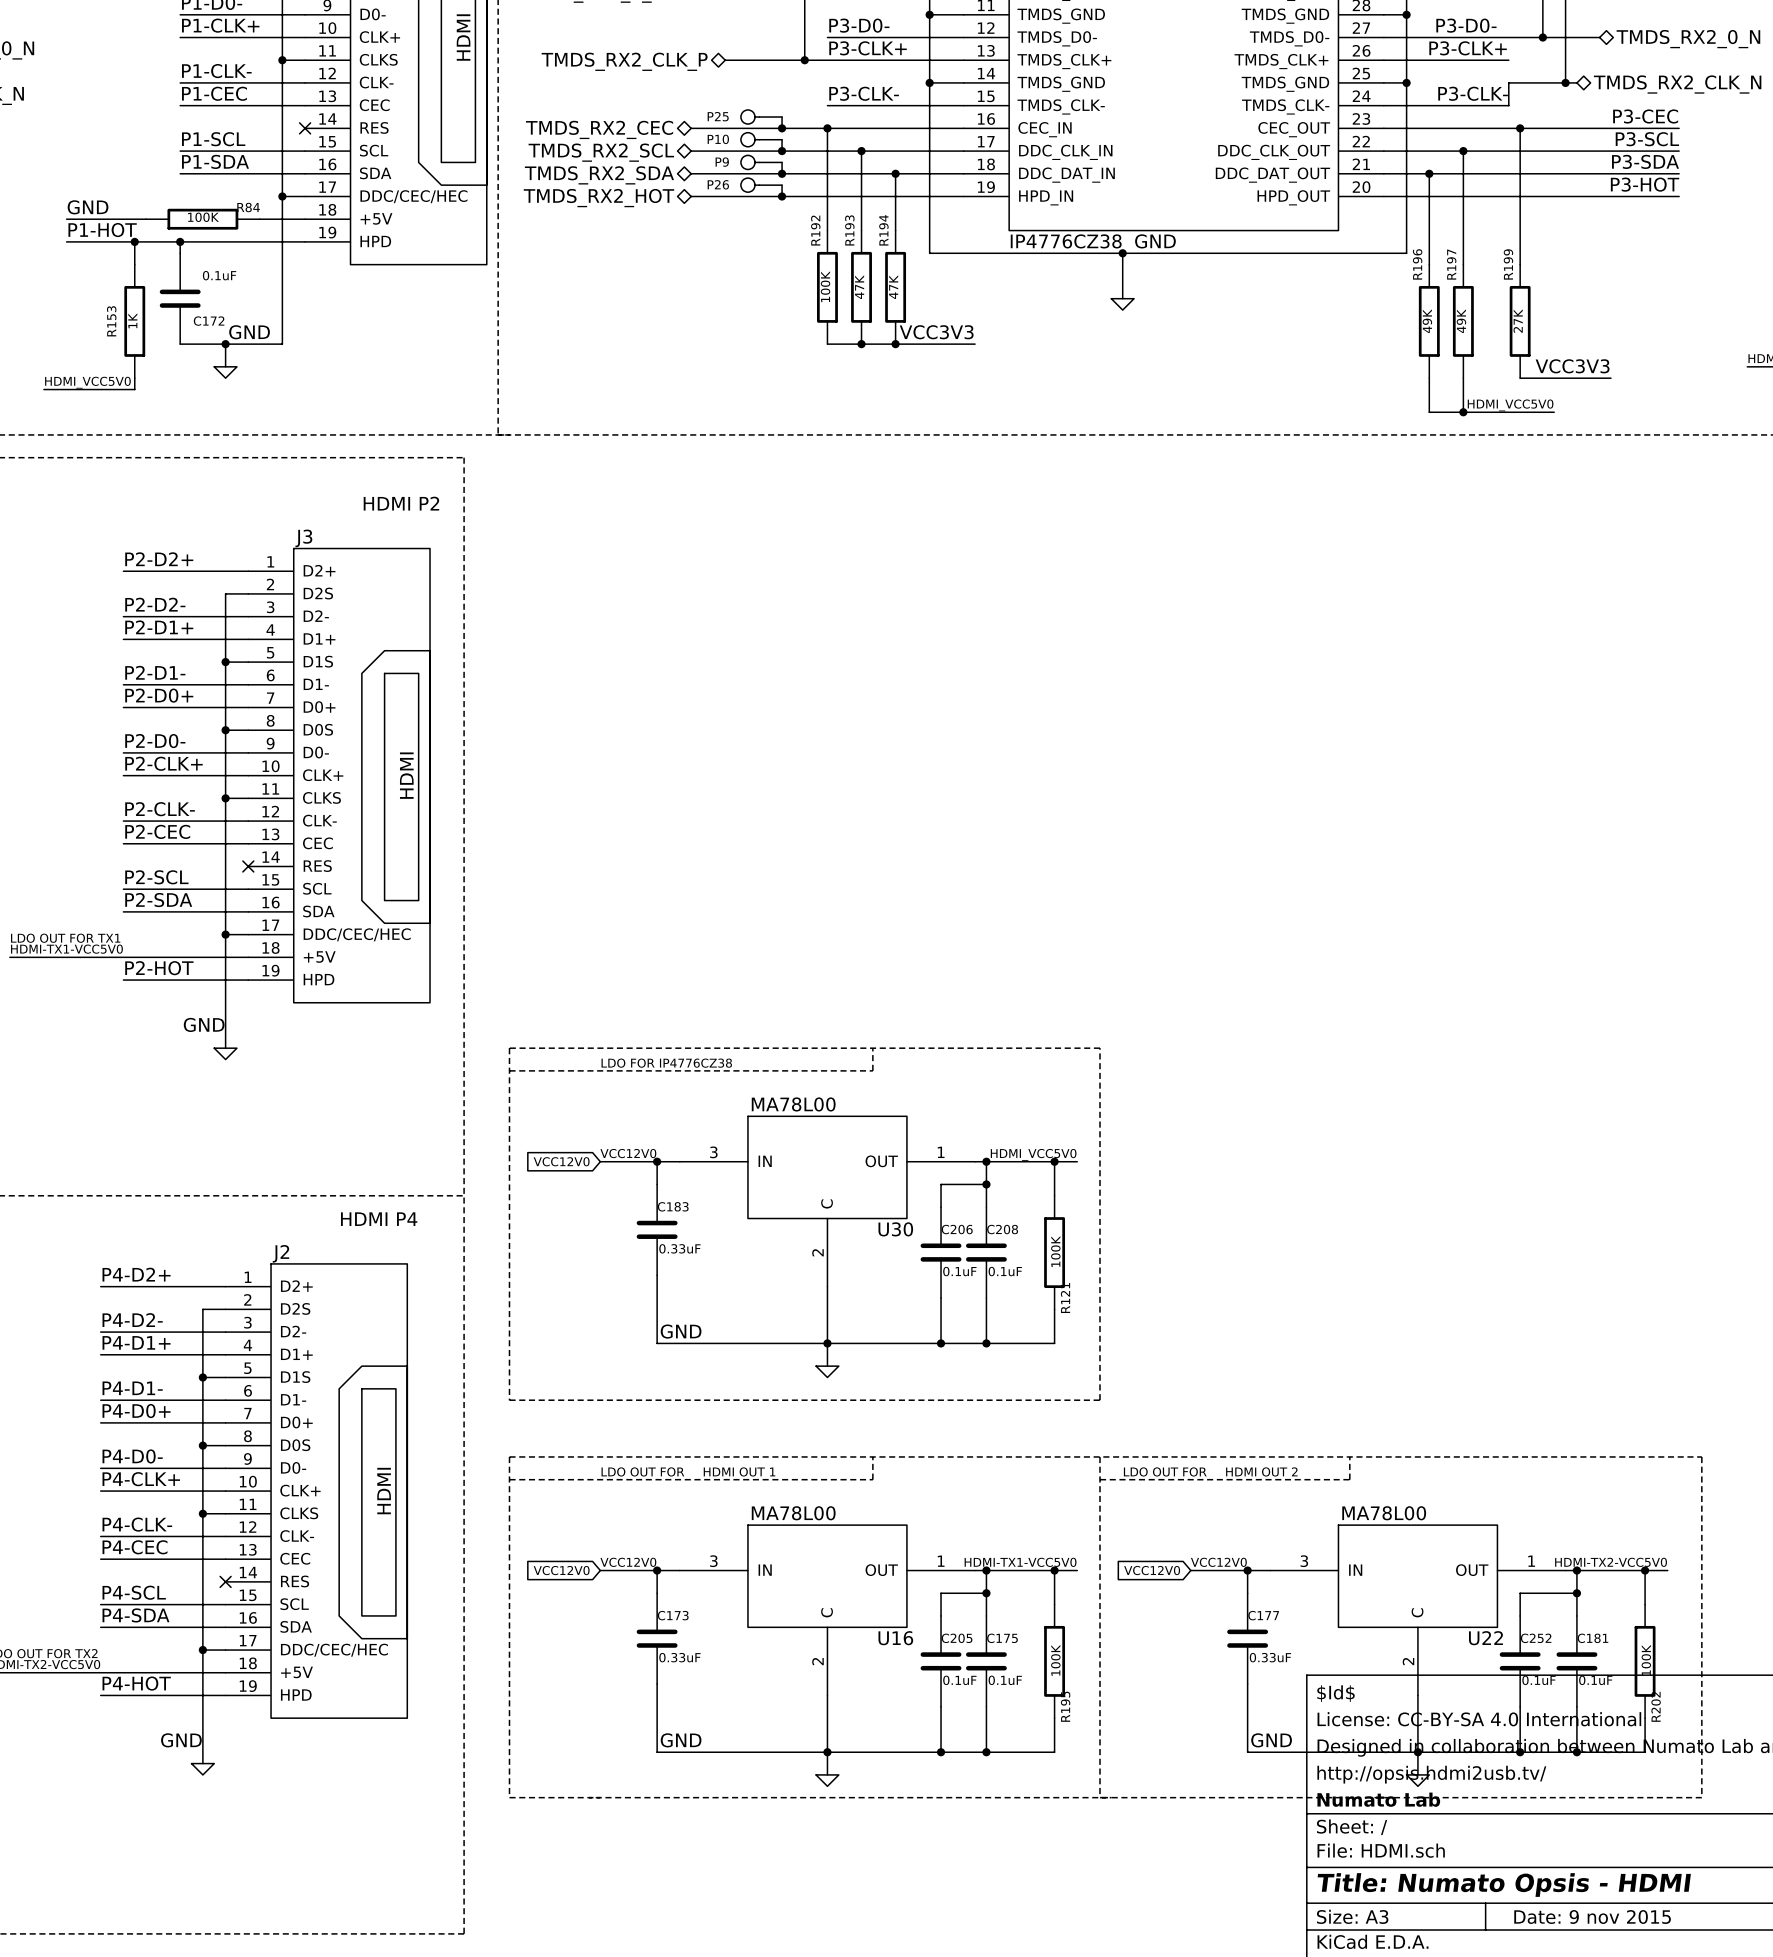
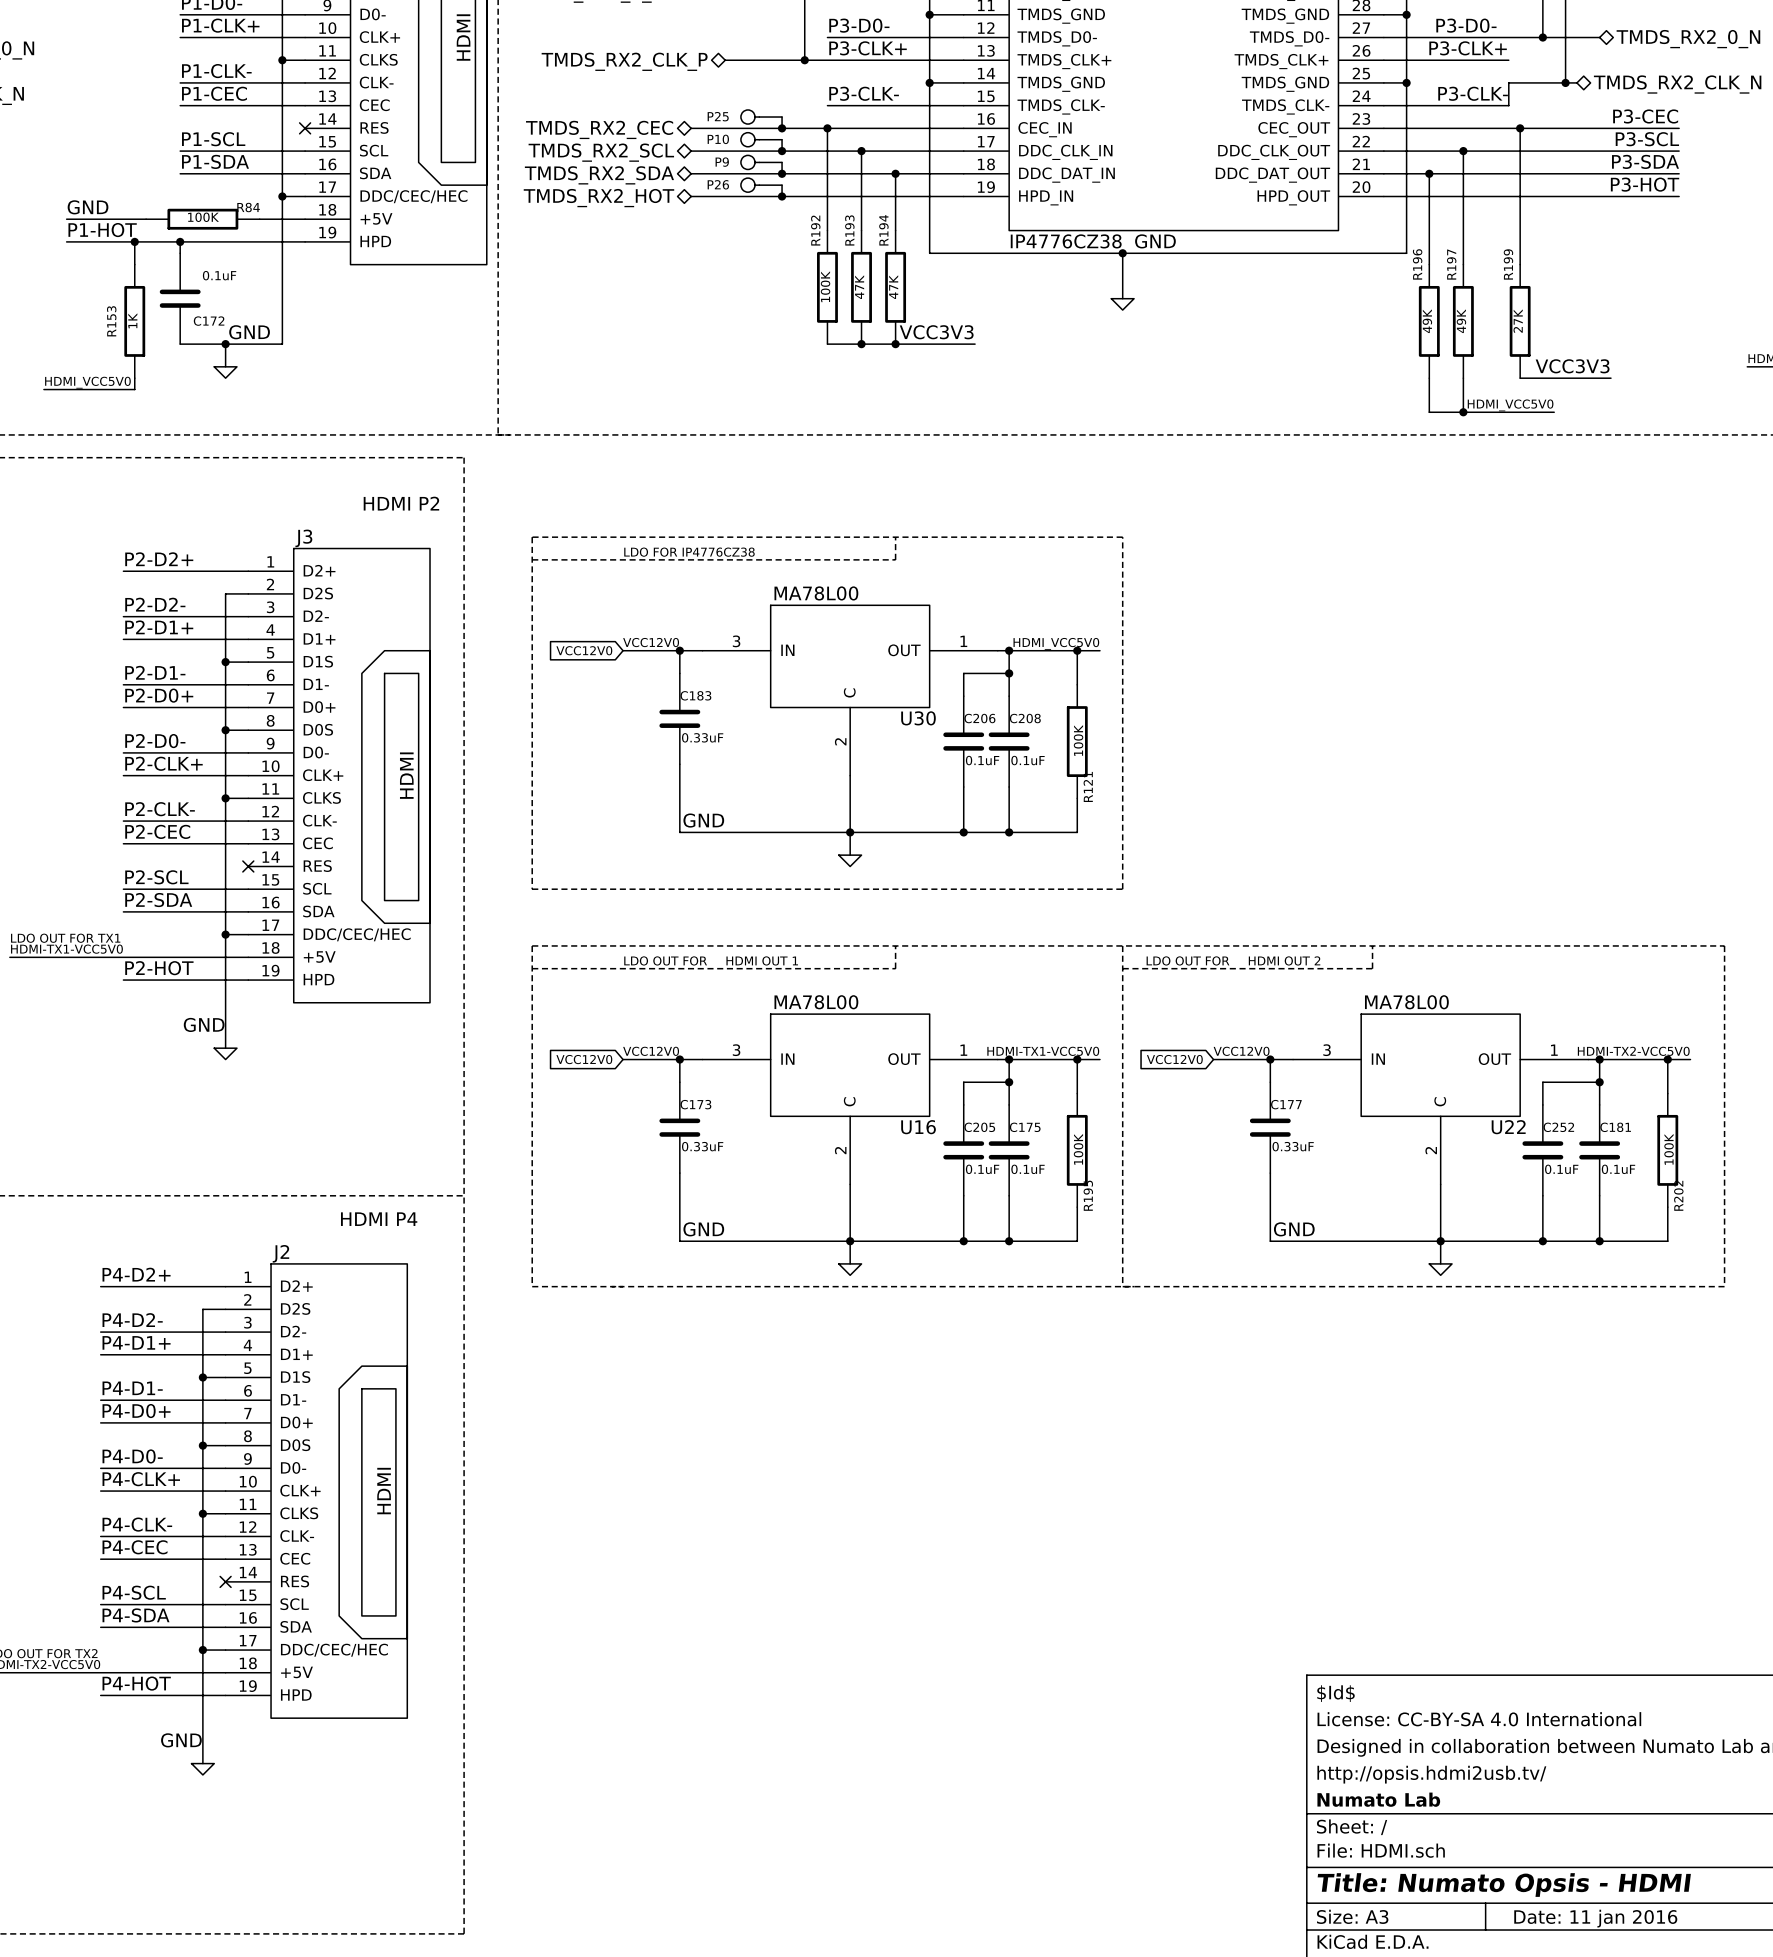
line: none -> (532, 537) (1122, 537) (1122, 889) (532, 889) (532, 537)
line: none -> (895, 537) (895, 559) (532, 559)
text: none -> LDO FOR IP4776CZ38 (689, 552)
label: none -> VCC12V0 (651, 642)
label: none -> HDMI_VCC5V0 (1056, 643)
global label: none -> VCC12V0 (584, 650)
wire: none -> (623, 650) (702, 650)
wire: none -> (679, 650) (679, 673)
junction: none -> (679, 650)
wire: none -> (997, 650) (1099, 650)
wire: none -> (1009, 650) (1009, 696)
junction: none -> (1009, 650)
wire: none -> (1077, 650) (1077, 684)
junction: none -> (1077, 650)
wire: none -> (1009, 673) (963, 673) (963, 696)
junction: none -> (1009, 673)
wire: none -> (679, 764) (679, 832) (1077, 832) (1077, 798)
wire: none -> (850, 775) (850, 855)
wire: none -> (963, 786) (963, 832)
wire: none -> (1009, 786) (1009, 832)
label: none -> GND (703, 820)
junction: none -> (850, 832)
junction: none -> (963, 832)
junction: none -> (1009, 832)
power symbol: none -> (850, 860)
line: none -> (532, 945) (532, 1286) (1724, 1286) (1724, 945) (532, 945)
line: none -> (1122, 945) (1122, 1286)
line: none -> (1372, 945) (1372, 968) (1122, 968)
text: none -> LDO OUT FOR (665, 960)
text: none -> HDMI OUT 1 (762, 960)
text: none -> LDO OUT FOR (1187, 960)
text: none -> HDMI OUT 2 (1284, 960)
line: (509, 1048) (1099, 1048) (1099, 1400) (509, 1400) (509, 1048) -> none
line: (872, 1048) (872, 1070) (509, 1070) -> (895, 945) (895, 968) (532, 968)
label: none -> HDMI-TX1-VCC5V0 (1043, 1051)
label: none -> VCC12V0 (1241, 1051)
label: none -> HDMI-TX2-VCC5V0 (1633, 1051)
junction: none -> (679, 1059)
junction: none -> (1009, 1059)
junction: none -> (1077, 1059)
global label: none -> VCC12V0 (1174, 1059)
wire: none -> (1213, 1059) (1293, 1059)
wire: none -> (1270, 1059) (1270, 1082)
junction: none -> (1270, 1059)
wire: none -> (1588, 1059) (1690, 1059)
wire: none -> (1599, 1059) (1599, 1104)
junction: none -> (1599, 1059)
wire: none -> (1667, 1059) (1667, 1093)
junction: none -> (1667, 1059)
text: LDO FOR IP4776CZ38 (666, 1063) -> none
junction: none -> (1009, 1082)
wire: none -> (1599, 1082) (1542, 1082) (1542, 1104)
junction: none -> (1599, 1082)
label position: VCC12V0 (628, 1153) -> VCC12V0 (651, 1051)
label: HDMI_VCC5V0 (1033, 1154) -> none
global label position: VCC12V0 (561, 1161) -> VCC12V0 (584, 1059)
wire: (600, 1161) (679, 1161) -> (623, 1059) (702, 1059)
wire: (657, 1161) (657, 1184) -> (679, 1059) (679, 1082)
junction: (657, 1161) -> none
wire: (975, 1161) (1077, 1161) -> (997, 1059) (1099, 1059)
wire: (986, 1161) (986, 1207) -> (1009, 1059) (1009, 1104)
junction: (986, 1161) -> none
wire: (1054, 1161) (1054, 1195) -> (1077, 1059) (1077, 1093)
junction: (1054, 1161) -> none
wire: none -> (1270, 1173) (1270, 1241) (1667, 1241) (1667, 1207)
wire: (986, 1184) (941, 1184) (941, 1207) -> (1009, 1082) (963, 1082) (963, 1104)
junction: (986, 1184) -> none
wire: none -> (1440, 1184) (1440, 1263)
wire: none -> (1542, 1195) (1542, 1241)
wire: none -> (1599, 1195) (1599, 1241)
U30 position: (827, 1201) -> (850, 690)
C183 position: (657, 1229) -> (679, 718)
label: none -> GND (1294, 1229)
junction: none -> (850, 1241)
junction: none -> (963, 1241)
junction: none -> (1009, 1241)
junction: none -> (1440, 1241)
junction: none -> (1542, 1241)
junction: none -> (1599, 1241)
C206 position: (941, 1252) -> (963, 741)
C208 position: (986, 1252) -> (1009, 741)
R121 position: (1054, 1252) -> (1077, 741)
power symbol: none -> (1440, 1269)
wire: (657, 1275) (657, 1343) (1054, 1343) (1054, 1309) -> (679, 1173) (679, 1241) (1077, 1241) (1077, 1207)
wire: (827, 1286) (827, 1366) -> (850, 1184) (850, 1263)
wire: (941, 1298) (941, 1343) -> (963, 1195) (963, 1241)
wire: (986, 1298) (986, 1343) -> (1009, 1195) (1009, 1241)
label position: GND (681, 1331) -> GND (703, 1229)
junction: (827, 1343) -> none
junction: (941, 1343) -> none
junction: (986, 1343) -> none
power symbol position: (827, 1371) -> (850, 1269)
line: (509, 1456) (509, 1797) (1701, 1797) (1701, 1456) (509, 1456) -> none
line: (872, 1456) (872, 1479) (509, 1479) -> none
line: (1099, 1456) (1099, 1797) -> none
line: (1349, 1456) (1349, 1479) (1099, 1479) -> none
text: LDO OUT FOR (642, 1471) -> none
text: HDMI OUT 1 (739, 1471) -> none
text: LDO OUT FOR (1165, 1471) -> none
text: HDMI OUT 2 (1261, 1471) -> none
label: VCC12V0 (628, 1562) -> none
label: HDMI-TX1-VCC5V0 (1020, 1562) -> none
label: VCC12V0 (1218, 1562) -> none
label: HDMI-TX2-VCC5V0 (1611, 1562) -> none
global label: VCC12V0 (561, 1570) -> none
wire: (600, 1570) (679, 1570) -> none
wire: (657, 1570) (657, 1593) -> none
junction: (657, 1570) -> none
wire: (975, 1570) (1077, 1570) -> none
wire: (986, 1570) (986, 1615) -> none
junction: (986, 1570) -> none
wire: (1054, 1570) (1054, 1604) -> none
junction: (1054, 1570) -> none
global label: VCC12V0 (1152, 1570) -> none
wire: (1190, 1570) (1270, 1570) -> none
wire: (1247, 1570) (1247, 1593) -> none
junction: (1247, 1570) -> none
wire: (1565, 1570) (1667, 1570) -> none
wire: (1576, 1570) (1576, 1615) -> none
junction: (1576, 1570) -> none
wire: (1645, 1570) (1645, 1604) -> none
junction: (1645, 1570) -> none
wire: (986, 1593) (941, 1593) (941, 1615) -> none
junction: (986, 1593) -> none
wire: (1576, 1593) (1520, 1593) (1520, 1615) -> none
junction: (1576, 1593) -> none
U16 position: (827, 1610) -> (850, 1099)
U22 position: (1417, 1610) -> (1440, 1099)
C173 position: (657, 1638) -> (679, 1127)
C177 position: (1247, 1638) -> (1270, 1127)
C205 position: (941, 1661) -> (963, 1150)
C175 position: (986, 1661) -> (1009, 1150)
R195 position: (1054, 1661) -> (1077, 1150)
C252 position: (1520, 1661) -> (1542, 1150)
C181 position: (1576, 1661) -> (1599, 1150)
R202 position: (1645, 1661) -> (1667, 1150)
wire: (657, 1684) (657, 1752) (1054, 1752) (1054, 1718) -> none
wire: (1247, 1684) (1247, 1752) (1645, 1752) (1645, 1718) -> none
wire: (827, 1695) (827, 1774) -> none
wire: (1417, 1695) (1417, 1774) -> none
wire: (941, 1706) (941, 1752) -> none
wire: (986, 1706) (986, 1752) -> none
wire: (1520, 1706) (1520, 1752) -> none
wire: (1576, 1706) (1576, 1752) -> none
label: GND (681, 1740) -> none
label: GND (1271, 1740) -> none
junction: (827, 1752) -> none
junction: (941, 1752) -> none
junction: (986, 1752) -> none
junction: (1417, 1752) -> none
junction: (1520, 1752) -> none
junction: (1576, 1752) -> none
power symbol: (827, 1780) -> none
power symbol: (1417, 1780) -> none
title block: Date: 9 nov 2015 (1592, 1917) -> Date: 11 jan 2016 (1595, 1918)

